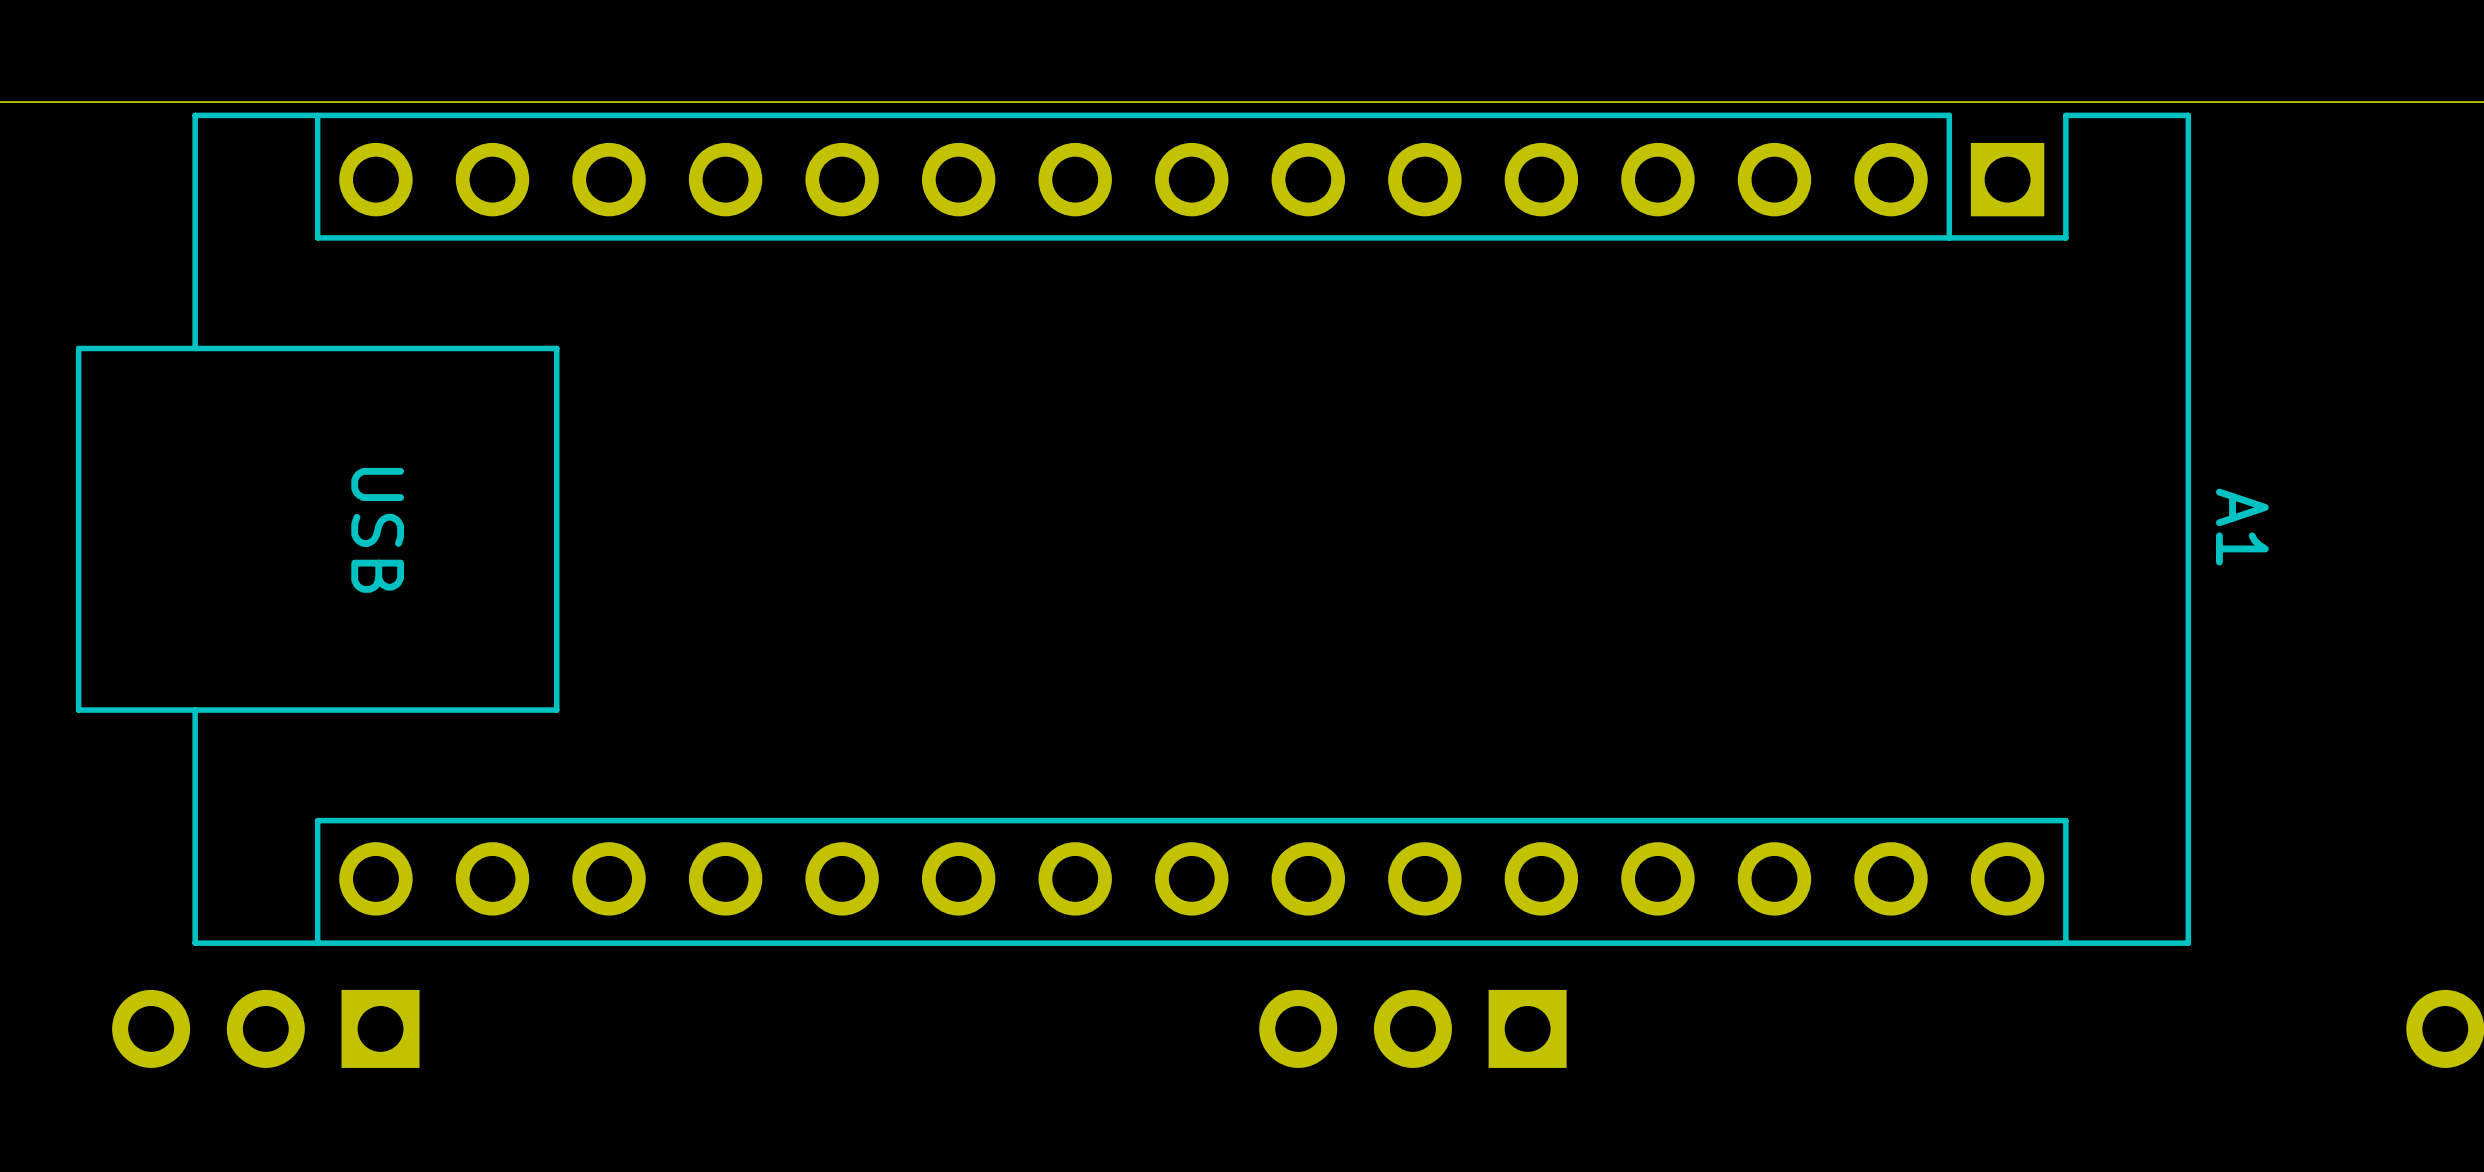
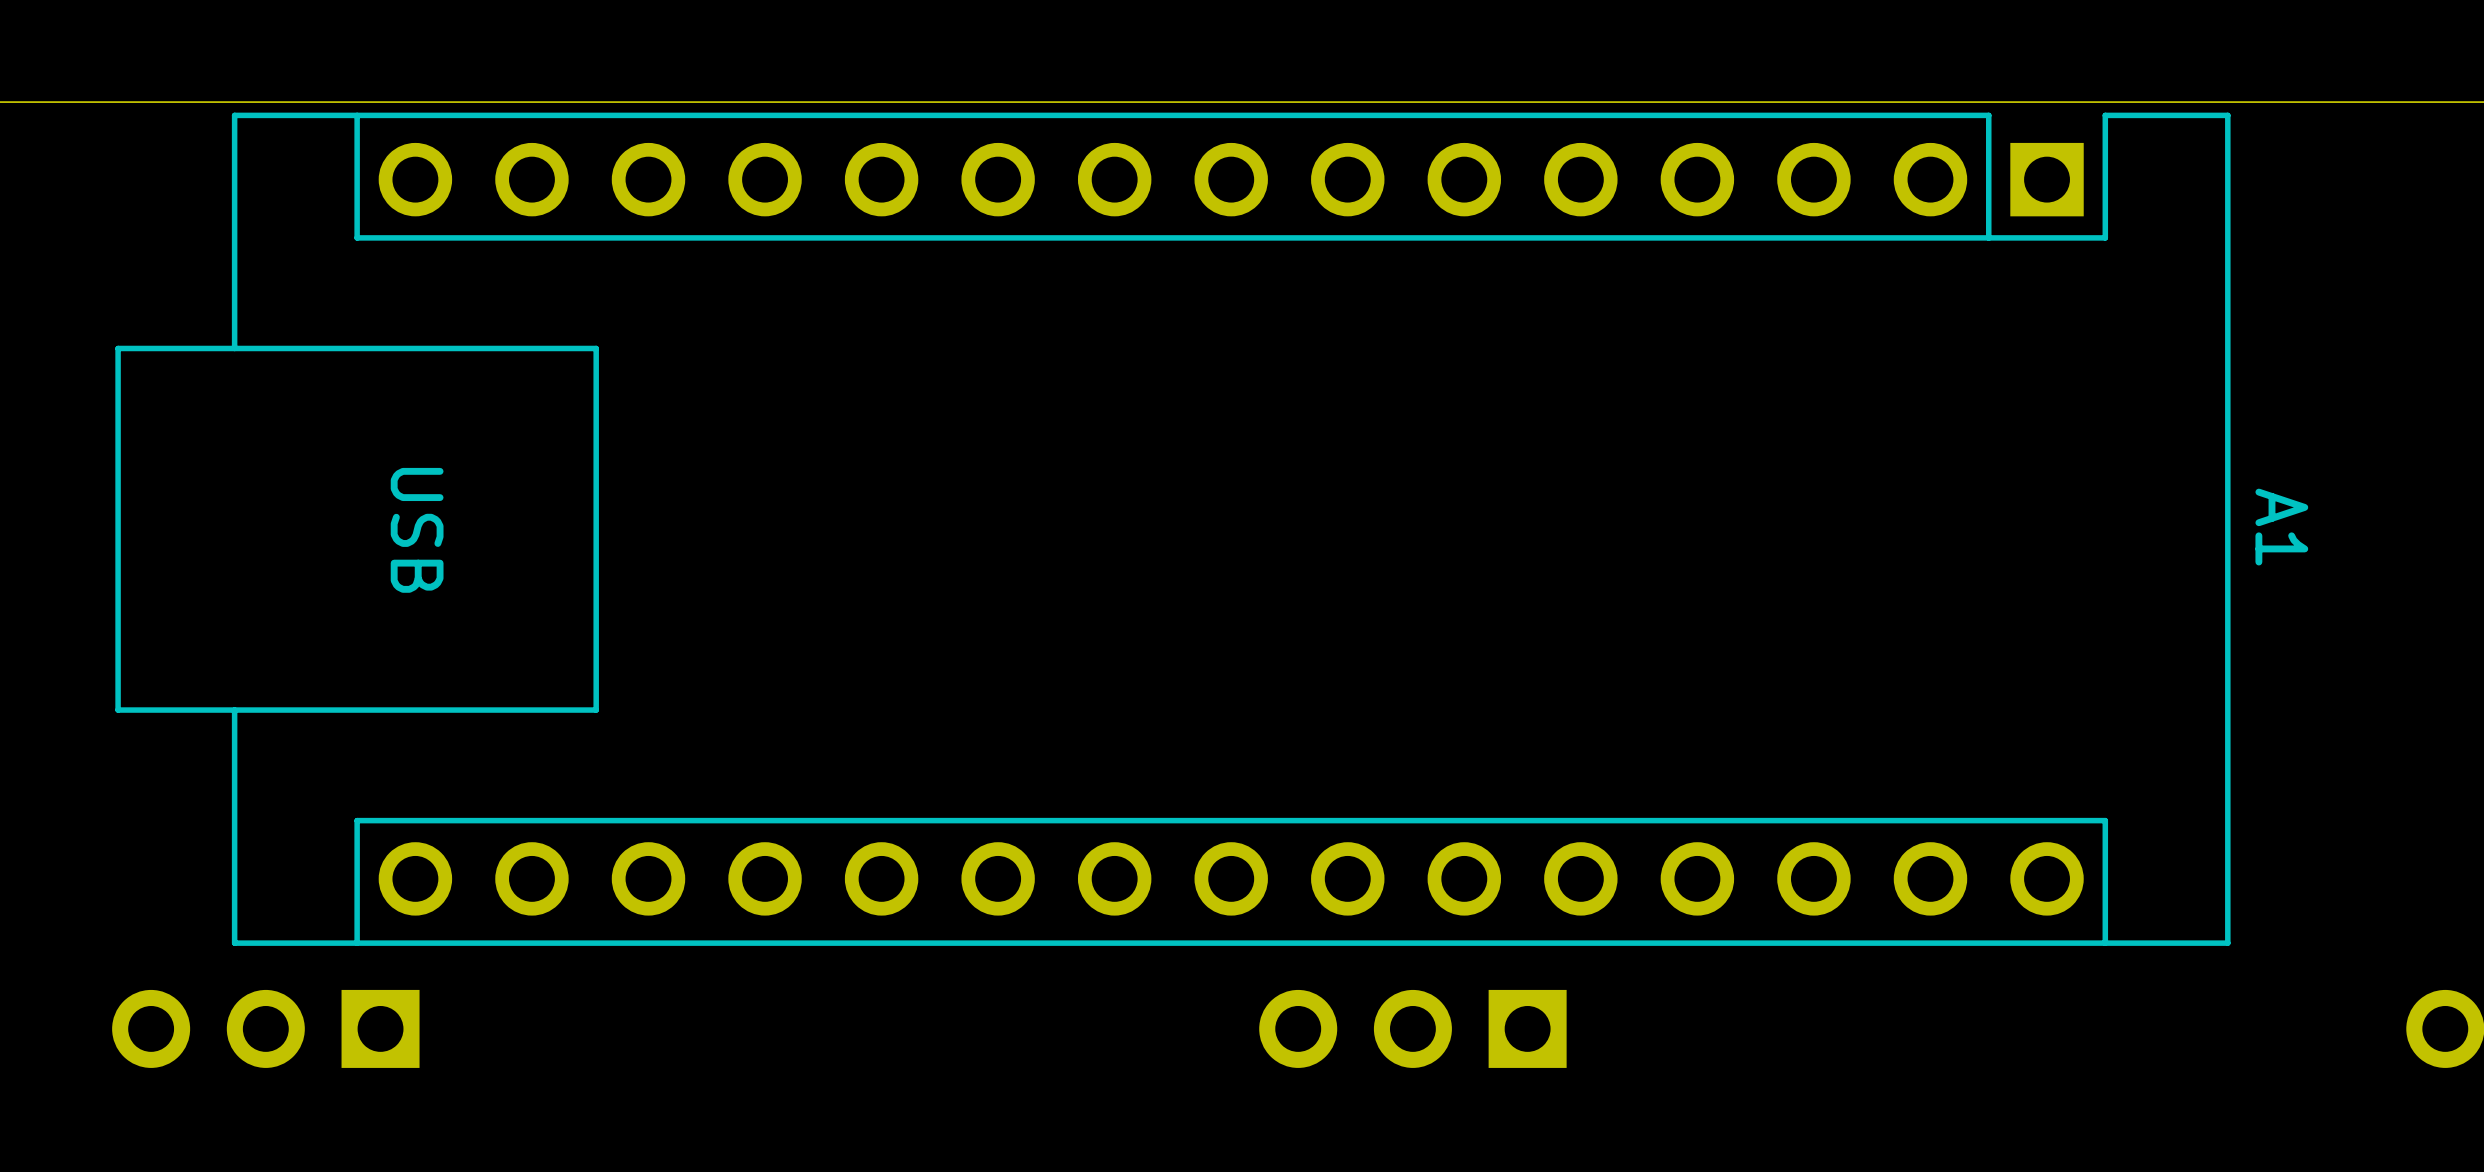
A1 position: (1133, 529) -> (1172, 529)

